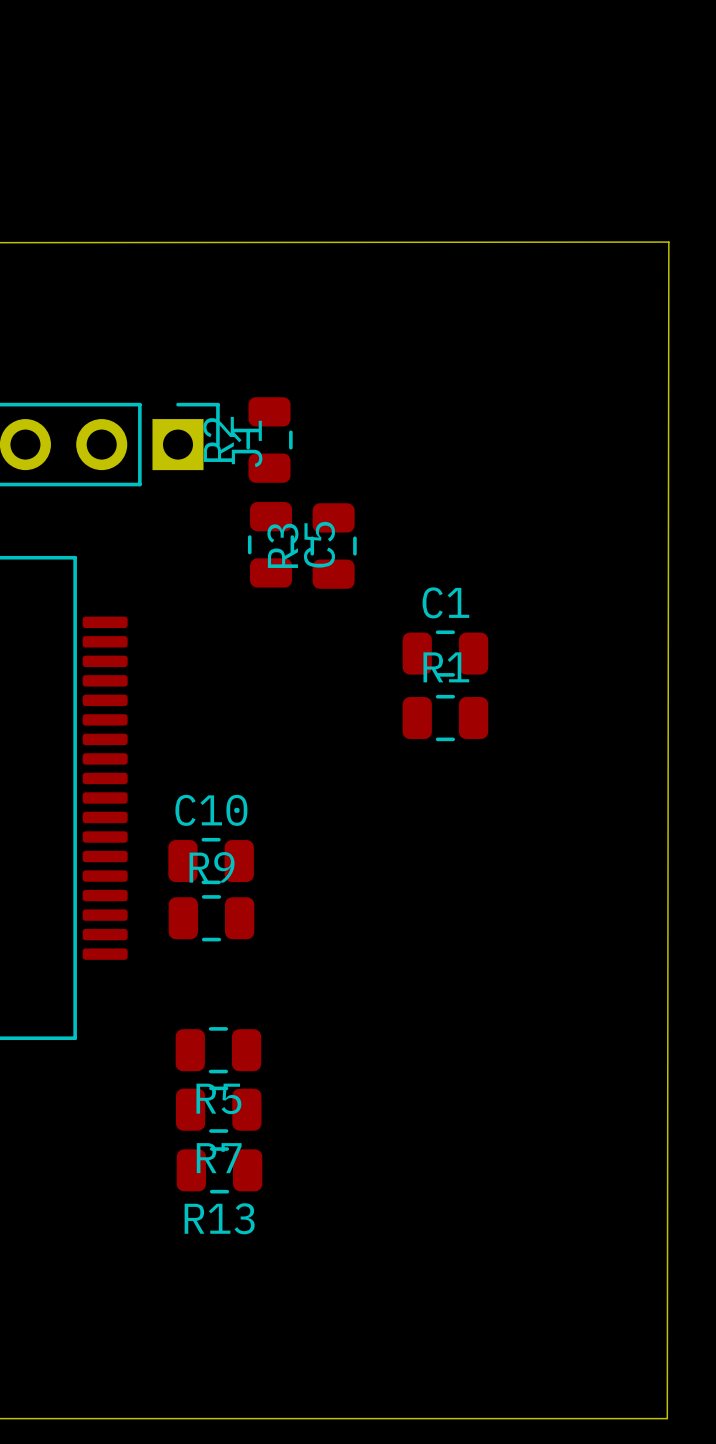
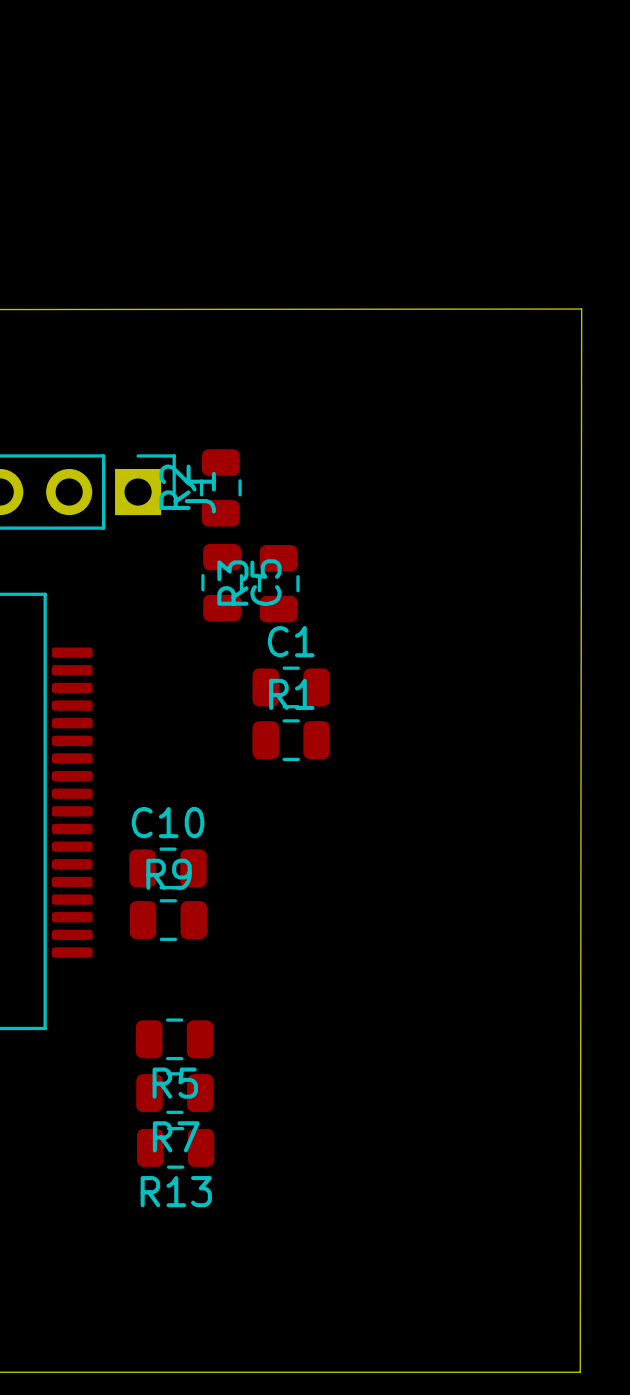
C1 position: (445, 653) -> (291, 687)
R1 position: (445, 718) -> (291, 740)

